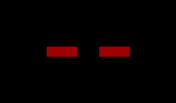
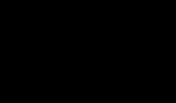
part: (88, 51) -> none

